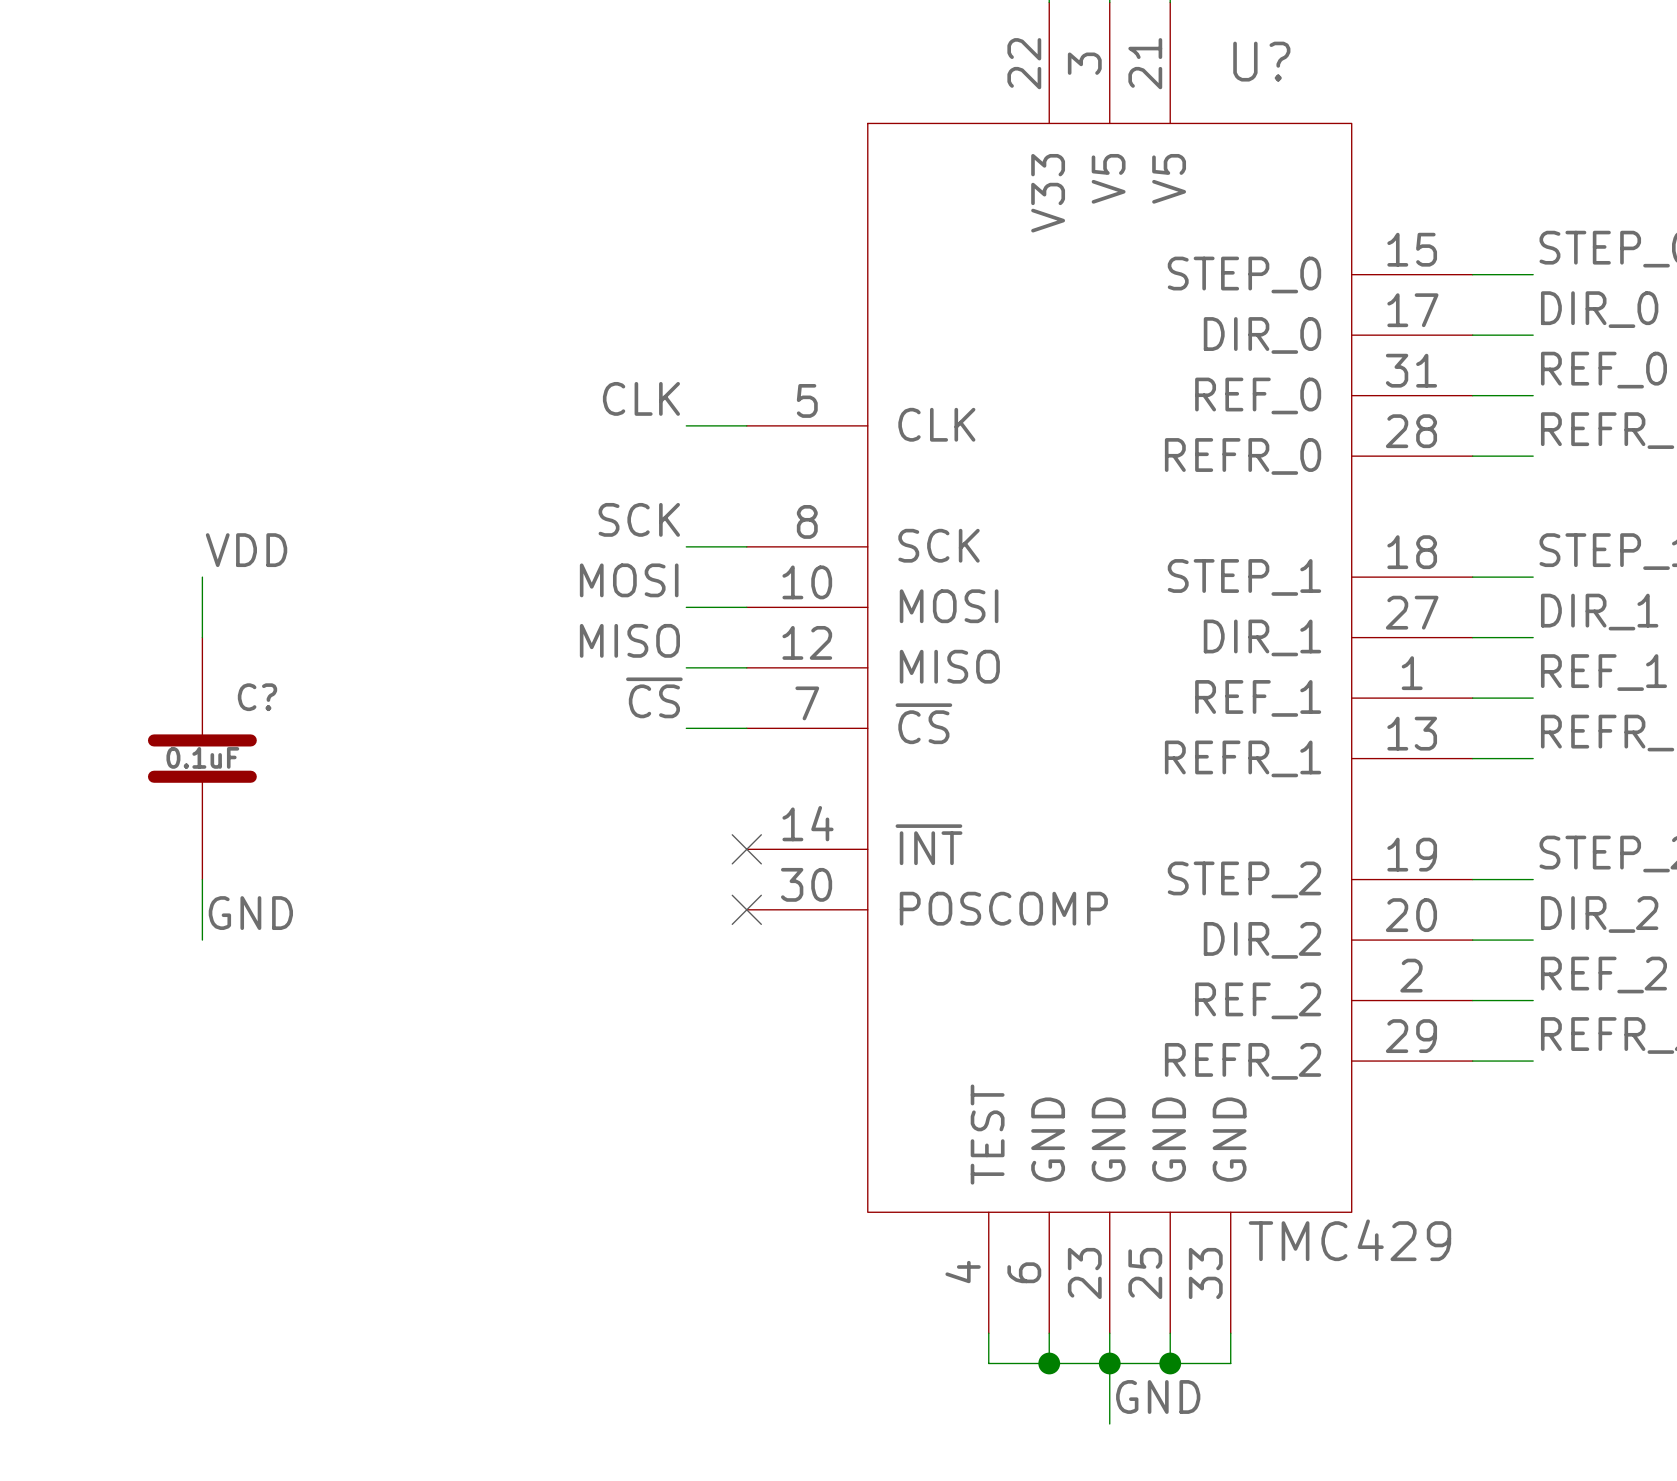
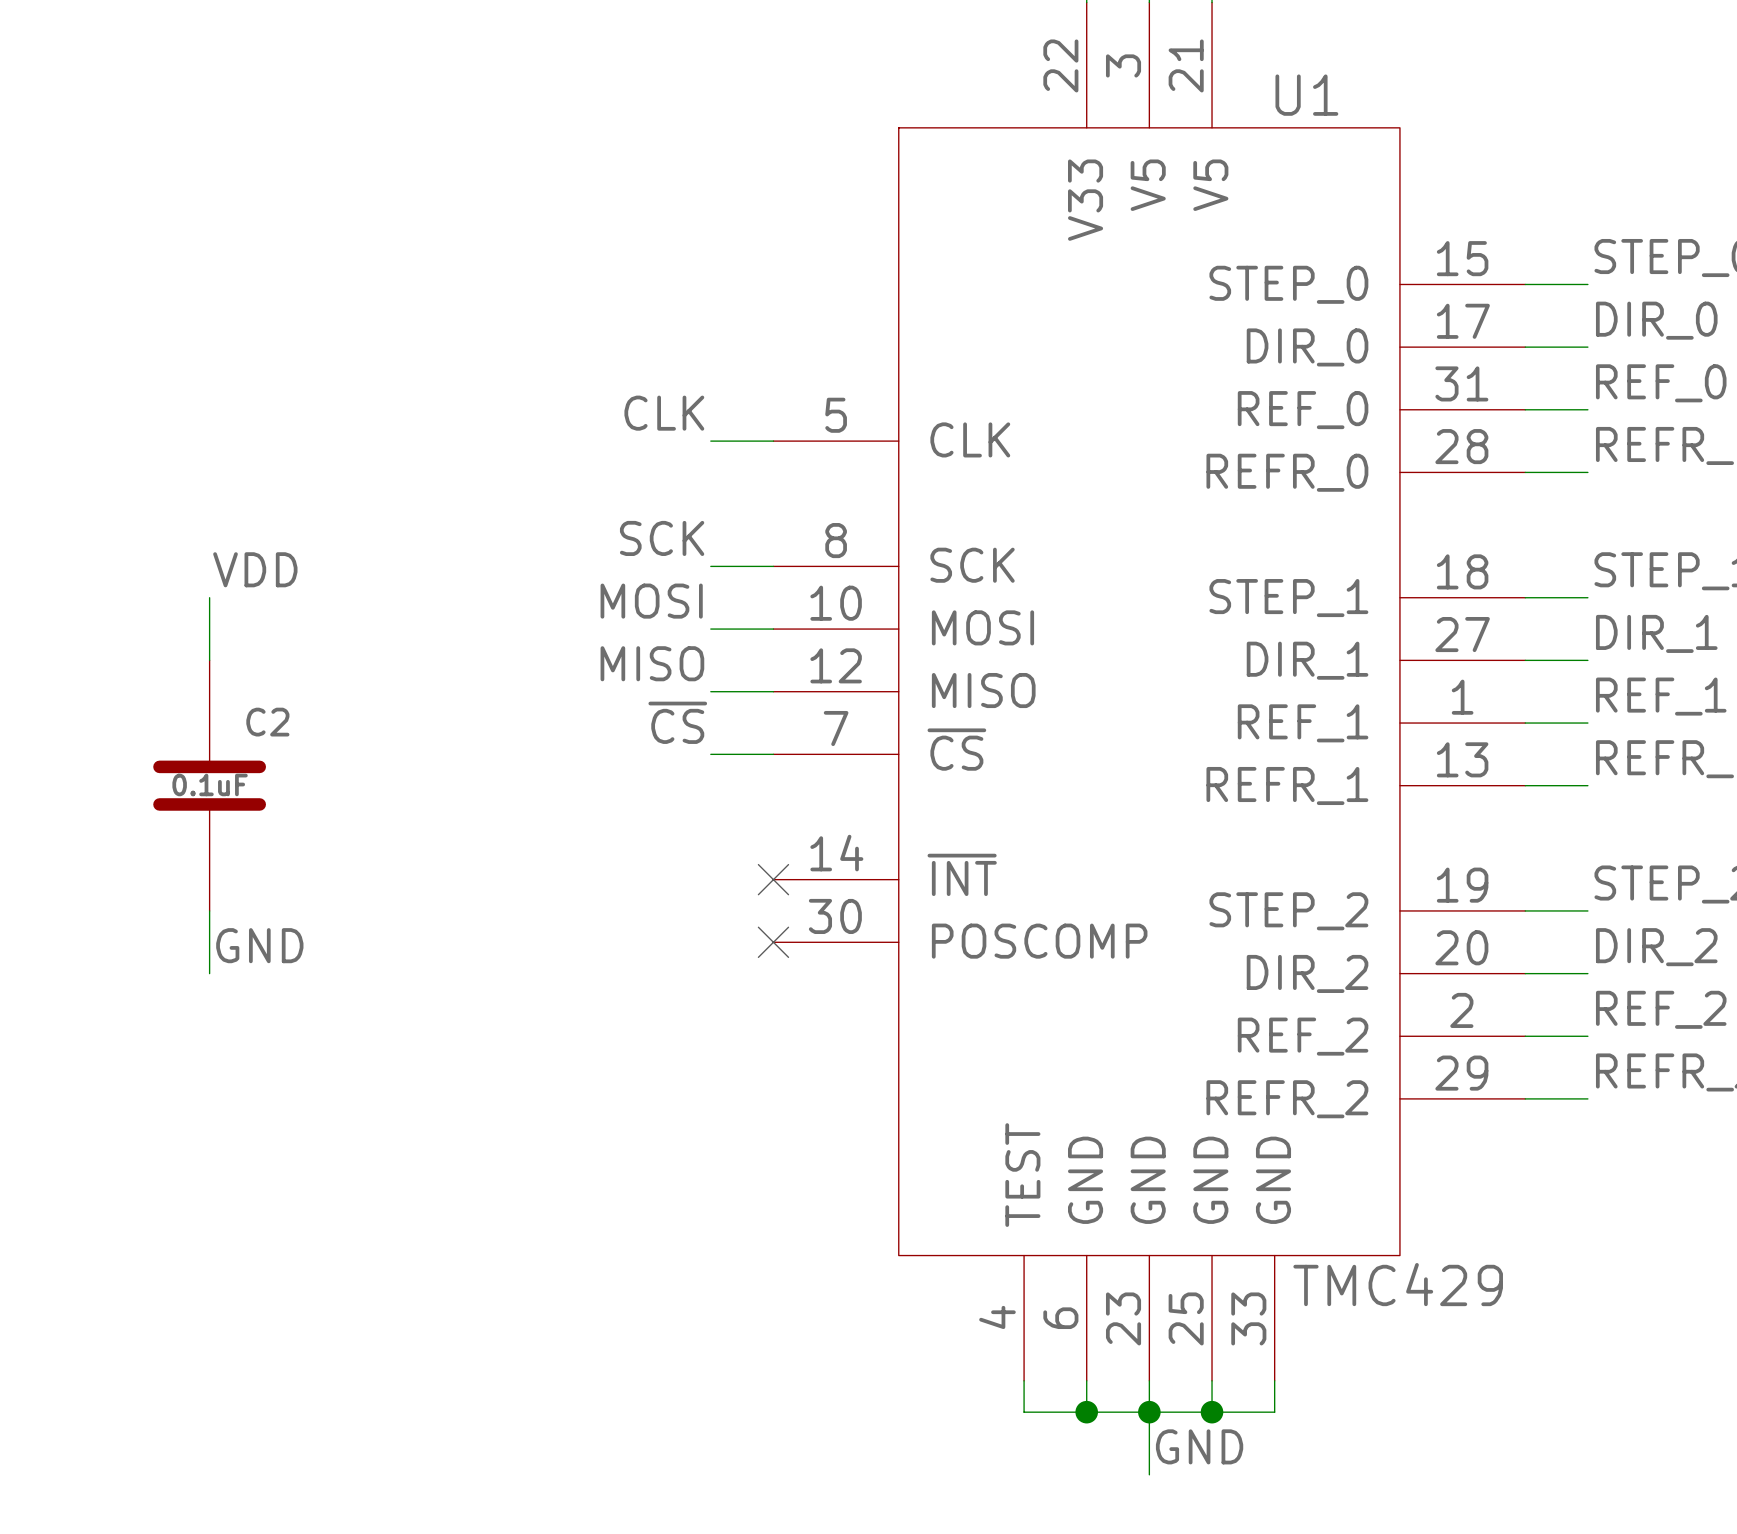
U? name: U? (1261, 61) -> U1 (1306, 95)
C? name: C? (257, 697) -> C2 (267, 722)

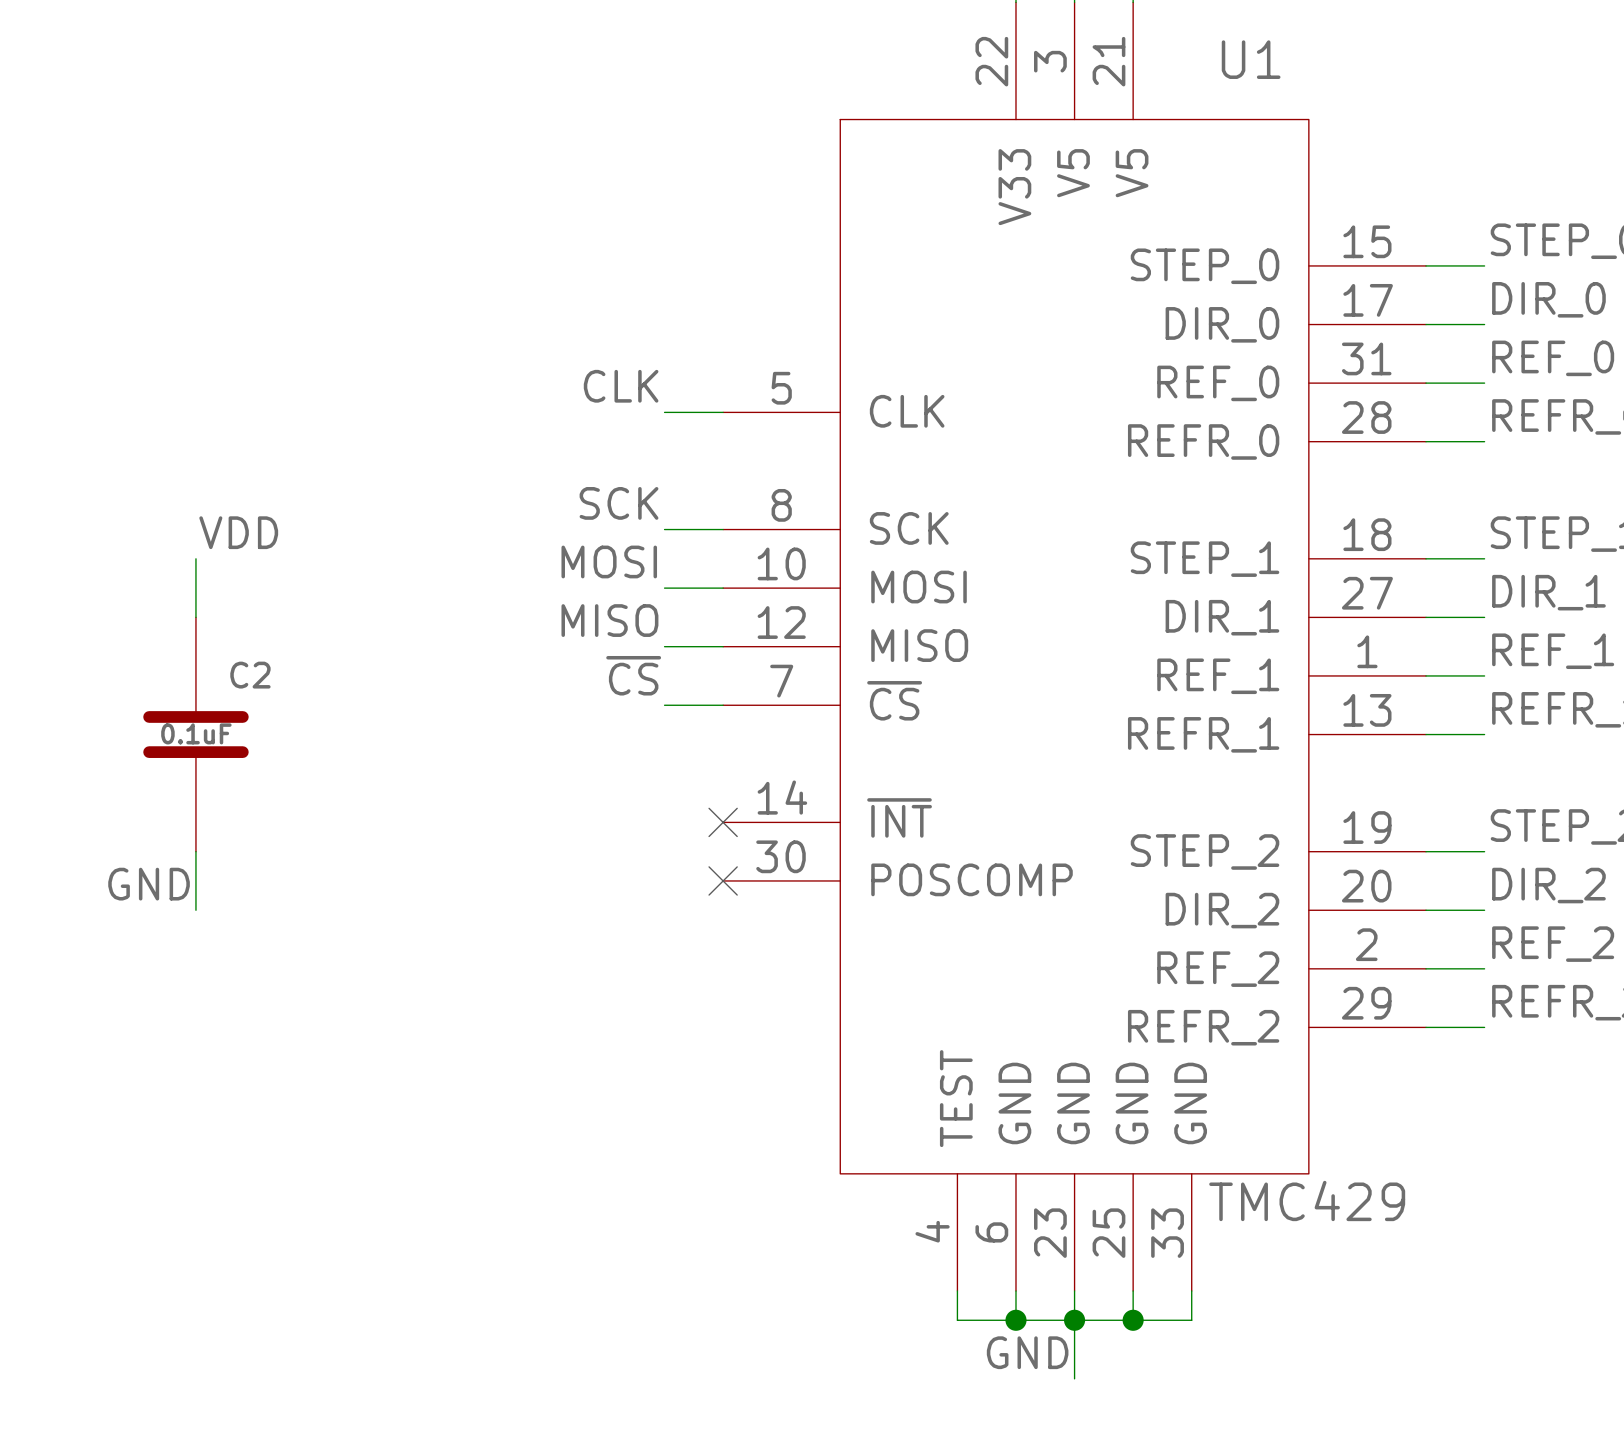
U1 name position: U1 (1306, 95) -> U1 (1251, 59)
label position: GND (259, 945) -> GND (149, 884)
label position: GND (1199, 1446) -> GND (1027, 1352)

